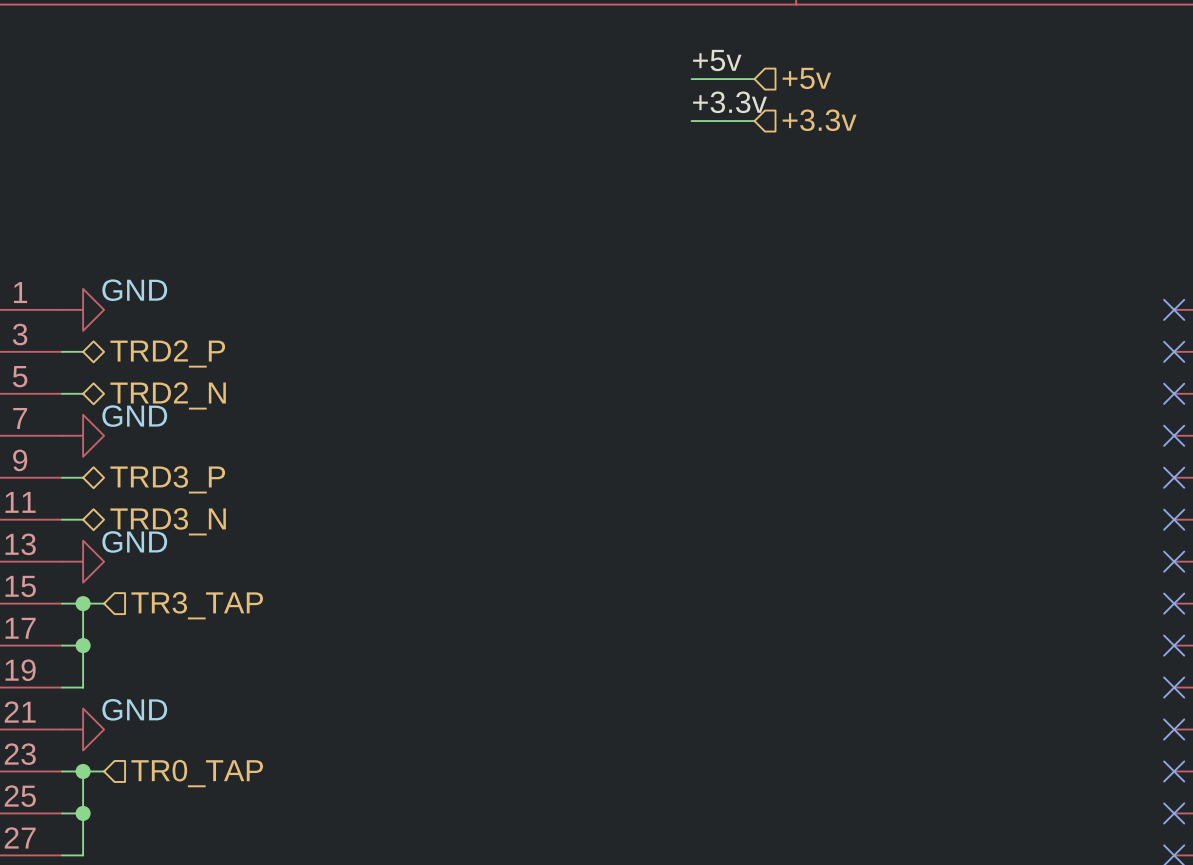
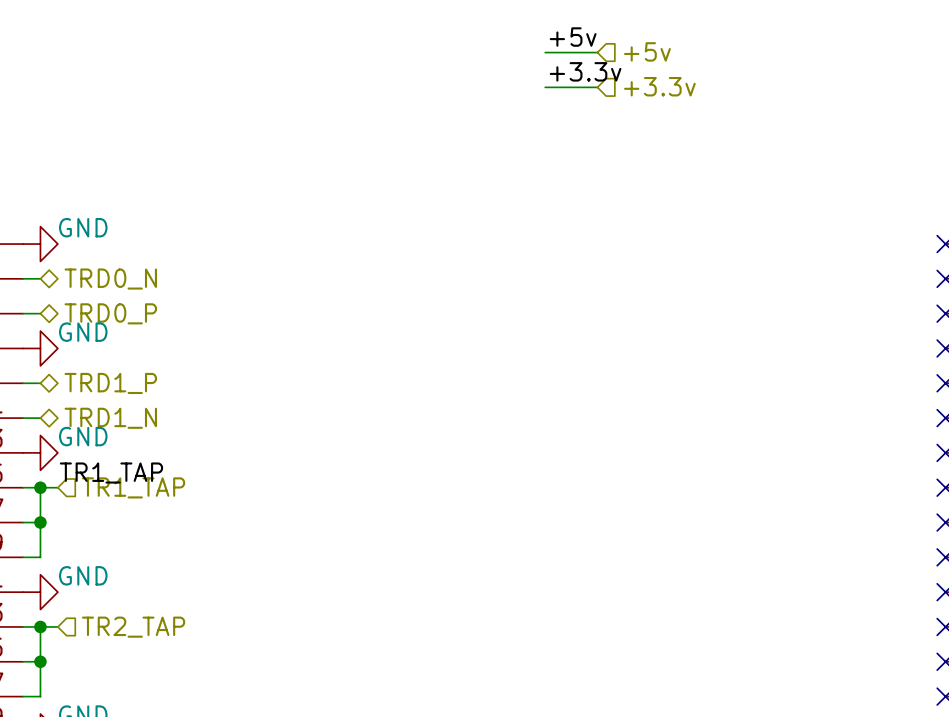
hierarchical label: TRD2_P (167, 353) -> TRD0_N (110, 279)
hierarchical label: TRD2_N (168, 395) -> TRD0_P (110, 313)
hierarchical label: TRD3_P (167, 479) -> TRD1_P (110, 383)
hierarchical label: TRD3_N (168, 521) -> TRD1_N (110, 418)
label: none -> TR1_TAP (111, 473)
hierarchical label: TR3_TAP (197, 605) -> TR1_TAP (133, 487)
hierarchical label: TR0_TAP (197, 773) -> TR2_TAP (133, 627)

